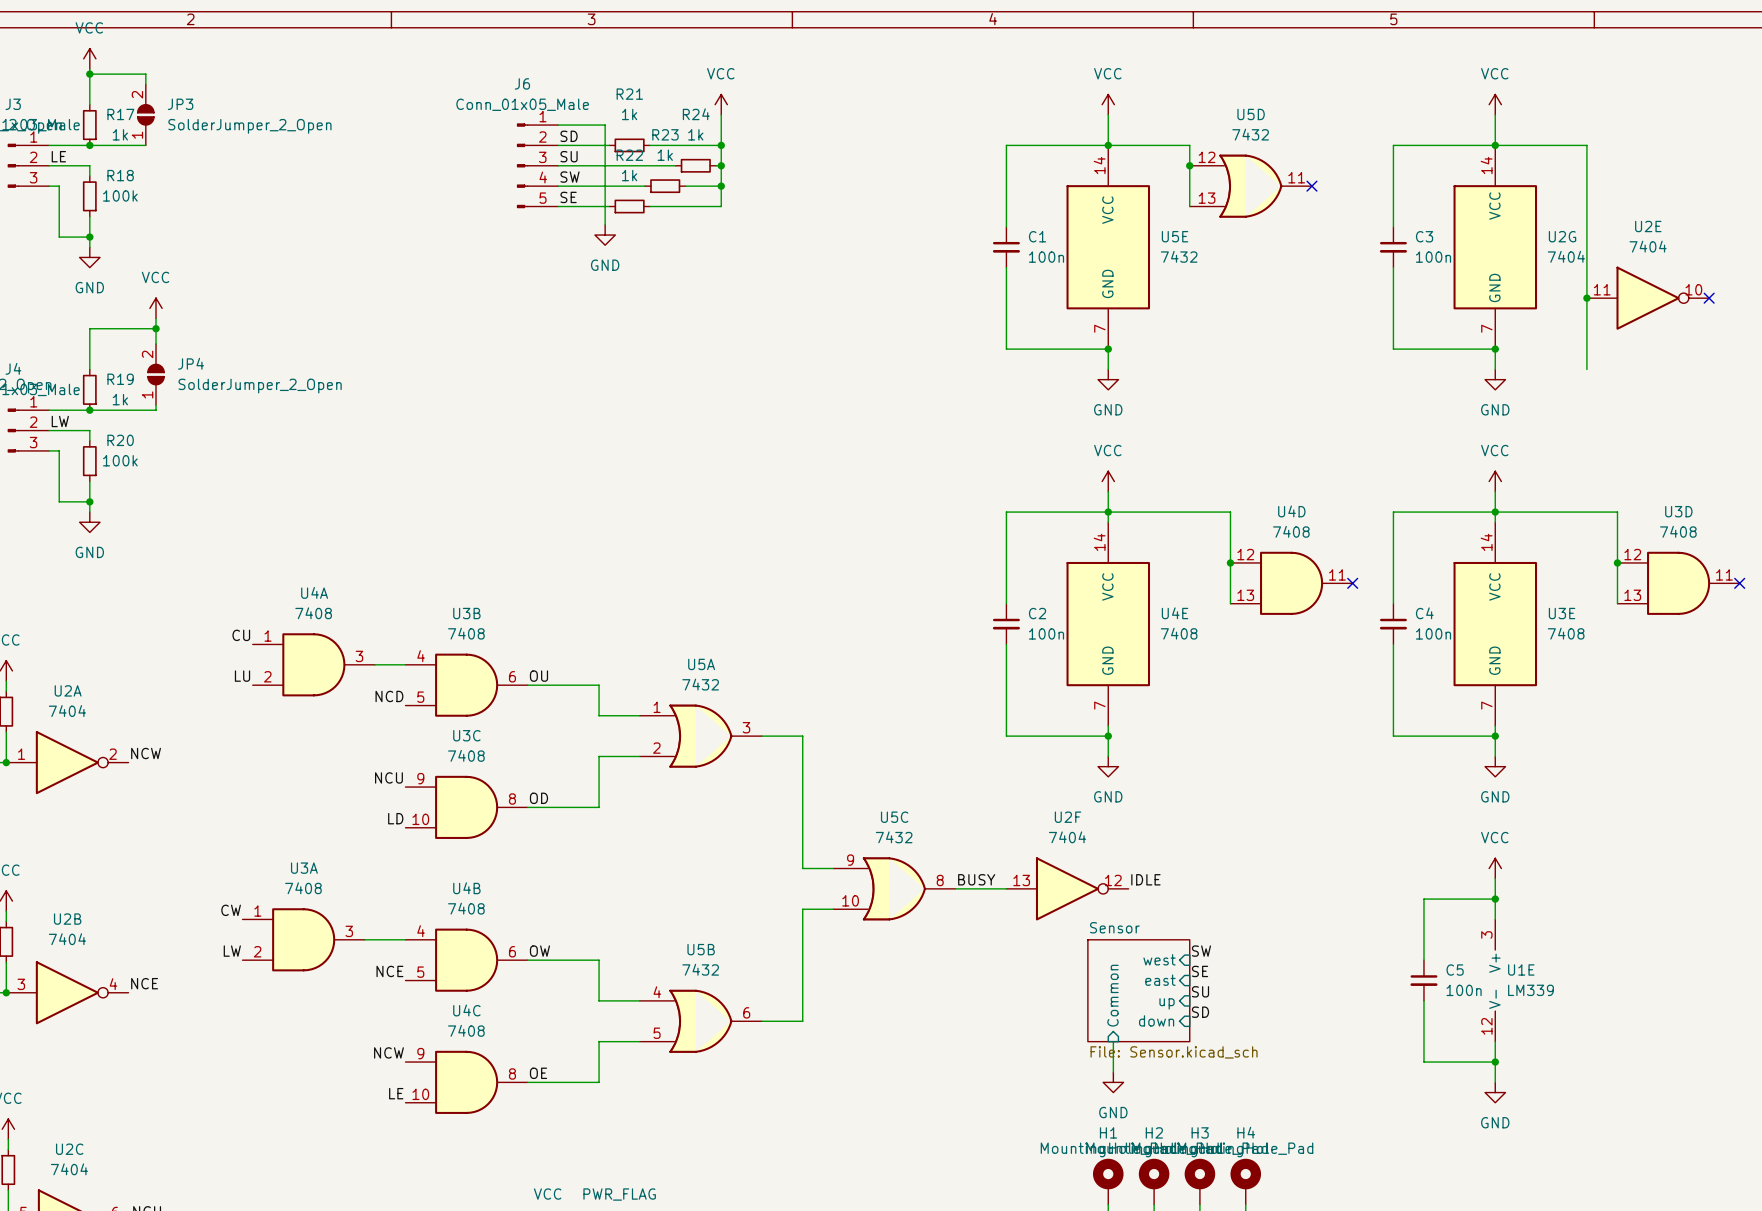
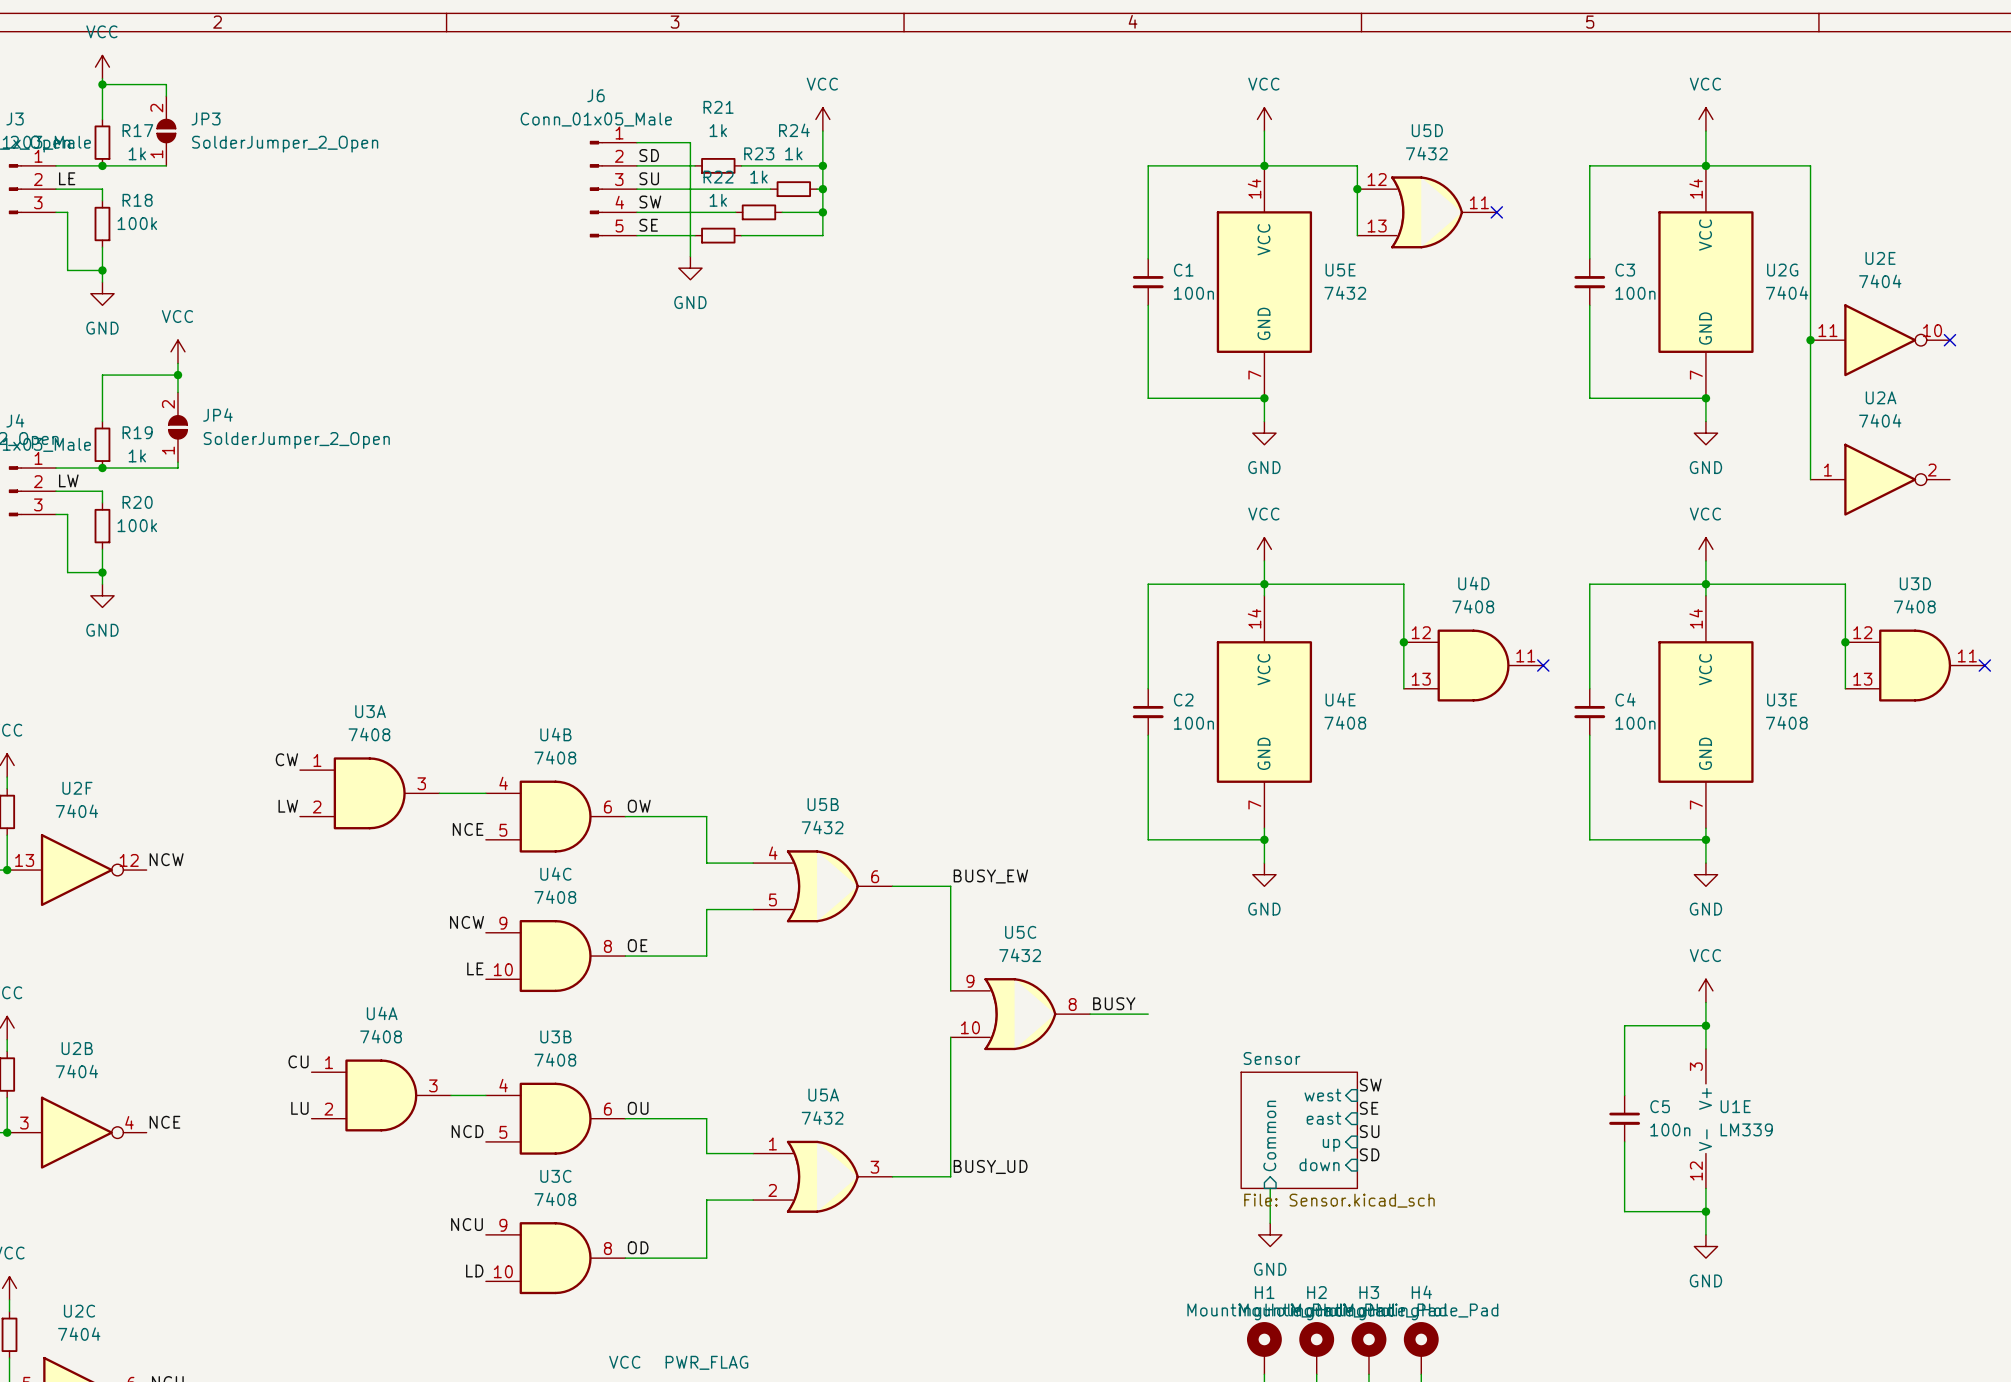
wire: none -> (1810, 421) (1810, 479)
label: CU (241, 635) -> none
U4A position: (313, 664) -> (381, 1095)
wire: (374, 664) (405, 664) -> none
label: none -> CW (286, 759)
label: LU (242, 676) -> none
label: OU (538, 676) -> none
U3B position: (466, 685) -> (555, 1118)
wire: (527, 685) (599, 685) (599, 715) -> (625, 816) (683, 816)
wire: none -> (439, 793) (485, 793)
label: NCD (389, 696) -> none
label: none -> LW (288, 806)
label: none -> OW (639, 806)
wire: (619, 715) (639, 715) -> (706, 816) (706, 863)
label: none -> NCE (468, 829)
U5A position: (700, 736) -> (822, 1176)
wire: (761, 736) (802, 736) (802, 868) (833, 868) -> (892, 886) (950, 886) (950, 990)
wire: (619, 756) (599, 756) (599, 807) (527, 807) -> none
U2A position: (67, 762) -> (1880, 479)
label: none -> BUSY_EW (990, 876)
label: NCU (388, 777) -> none
wire: none -> (753, 909) (706, 909) (706, 956) (625, 956)
label: OD (538, 798) -> none
U3C position: (466, 807) -> (555, 1258)
label: none -> NCW (467, 922)
label: LD (395, 818) -> none
label: none -> OE (637, 945)
label: none -> LE (475, 968)
label: IDLE (1145, 879) -> none
U2F position: (1067, 888) -> (76, 870)
wire: (833, 909) (802, 909) (802, 1021) (761, 1021) -> (950, 1037) (950, 1176) (892, 1176)
label: CW (231, 910) -> none
label: none -> CU (298, 1061)
U3A position: (303, 939) -> (369, 793)
wire: (364, 939) (405, 939) -> none
label: LW (232, 951) -> none
label: OW (539, 951) -> none
wire: none -> (451, 1095) (485, 1095)
U4B position: (466, 960) -> (555, 816)
wire: (527, 960) (599, 960) (599, 1000) (639, 1000) -> none
label: none -> LU (299, 1108)
label: NCE (389, 971) -> NCD (467, 1131)
label: none -> OU (638, 1108)
wire: none -> (625, 1118) (706, 1118) (706, 1153) (753, 1153)
U5B position: (700, 1021) -> (822, 886)
label: none -> BUSY_UD (990, 1166)
wire: (639, 1041) (599, 1041) (599, 1082) (527, 1082) -> none
wire: none -> (753, 1200) (706, 1200) (706, 1258) (625, 1258)
label: NCW (388, 1052) -> NCU (467, 1224)
label: OE (538, 1073) -> none
U4C position: (466, 1082) -> (555, 956)
label: LE (396, 1093) -> none
label: none -> OD (638, 1247)
label: none -> LD (474, 1271)

